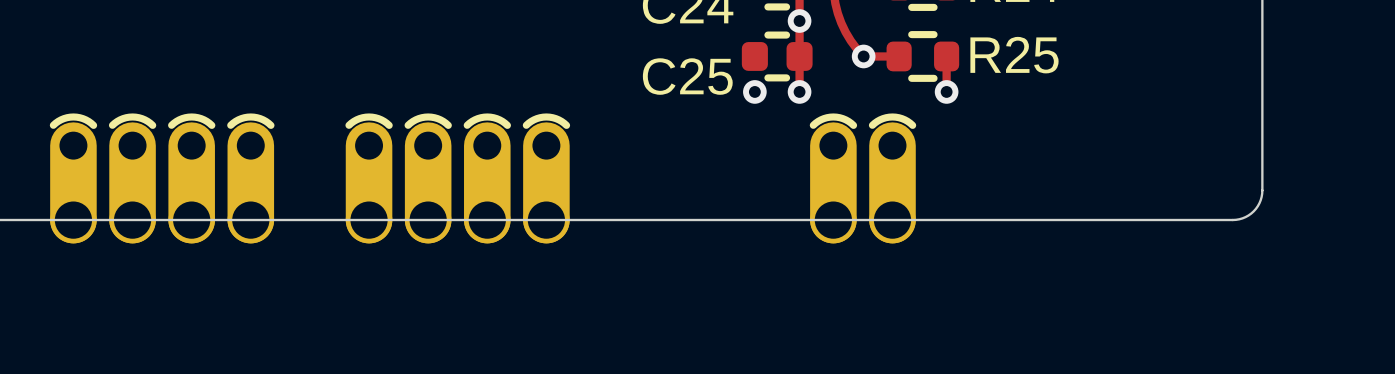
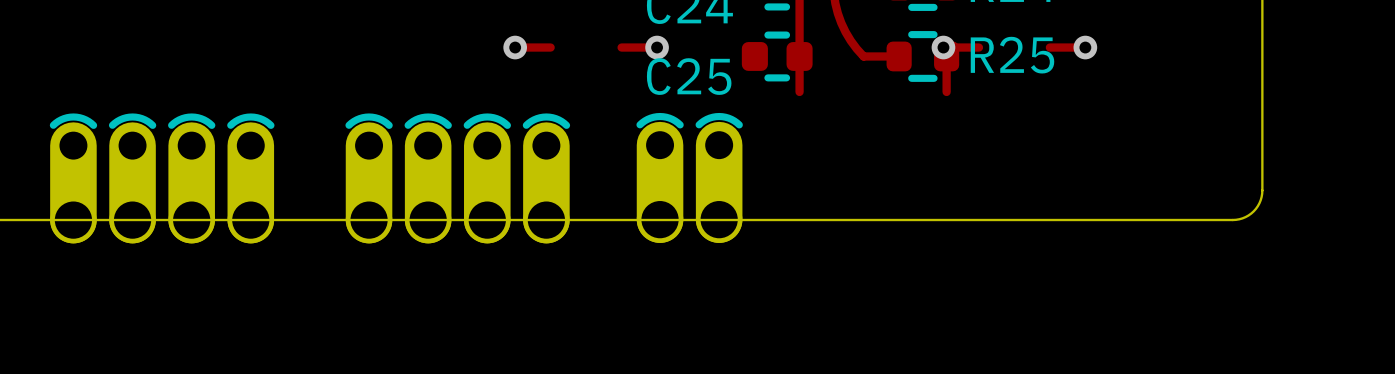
via: (799, 21) -> none
track: none -> (515, 47) (550, 47)
via: none -> (515, 47)
track: none -> (621, 47) (657, 47)
via: none -> (657, 47)
track: none -> (943, 47) (978, 47)
via: none -> (943, 47)
track: none -> (1049, 47) (1085, 47)
via: none -> (1085, 47)
via: (863, 56) -> none
via: (754, 91) -> none
via: (799, 91) -> none
via: (946, 91) -> none
part: none -> (660, 177)
part: none -> (719, 177)
part: (833, 178) -> none
part: (892, 178) -> none

